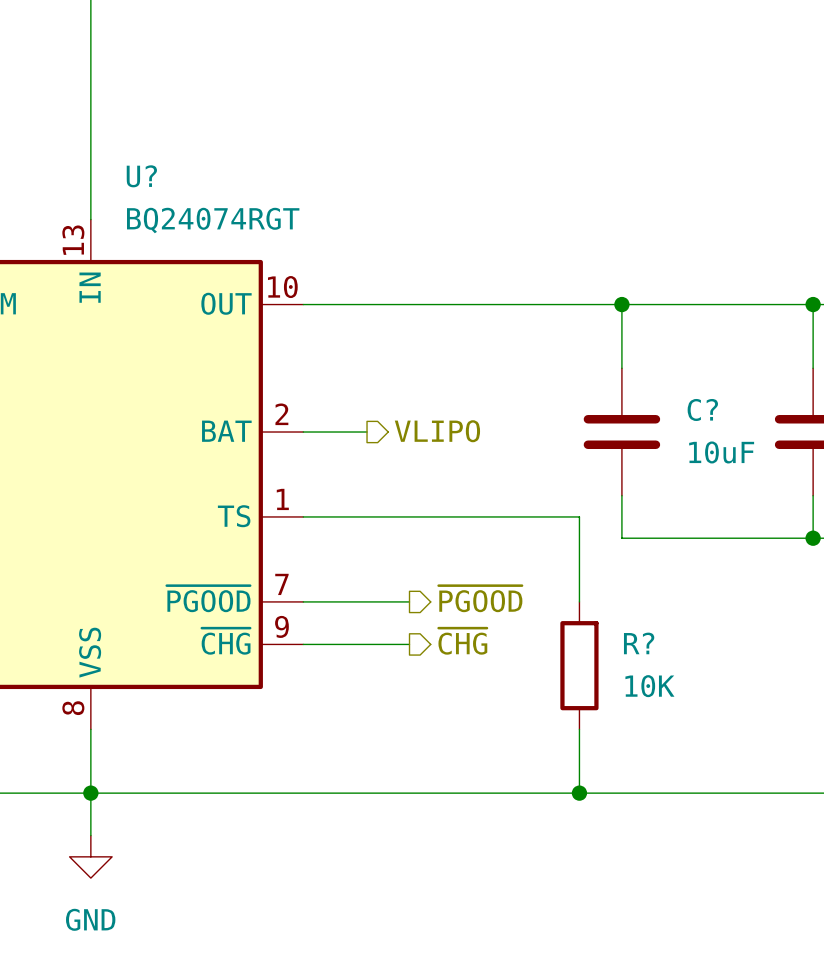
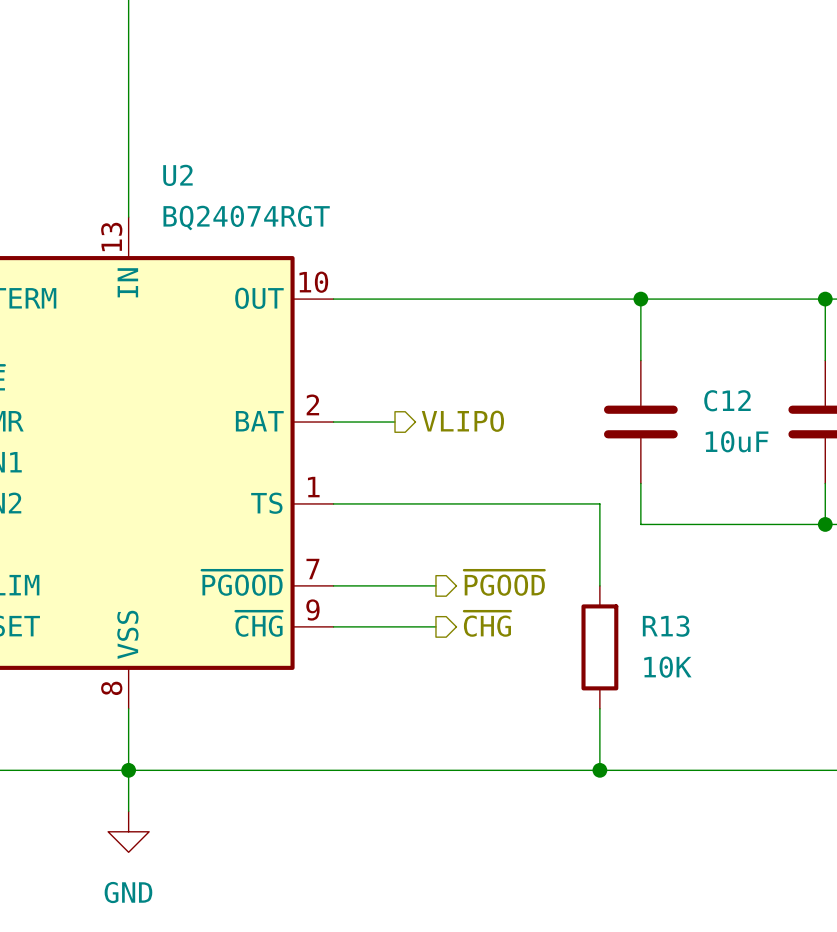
U? name: U? (141, 176) -> U2 (177, 175)
C? name: C? (702, 409) -> C12 (727, 400)
R? name: R? (639, 643) -> R13 (666, 626)

